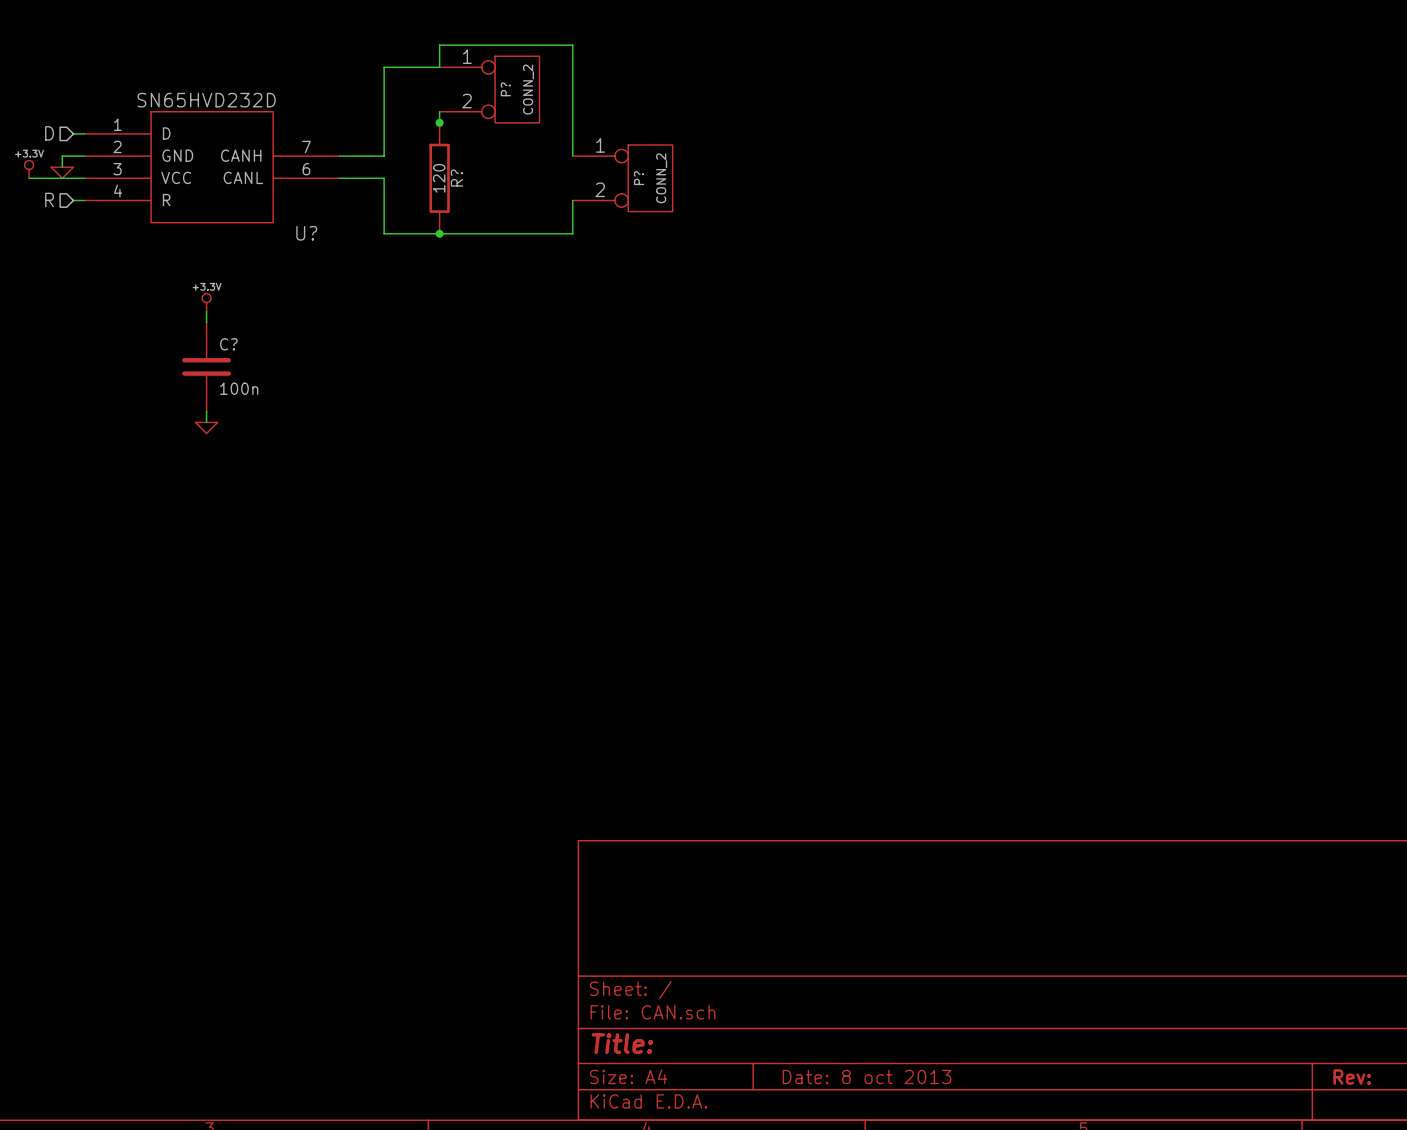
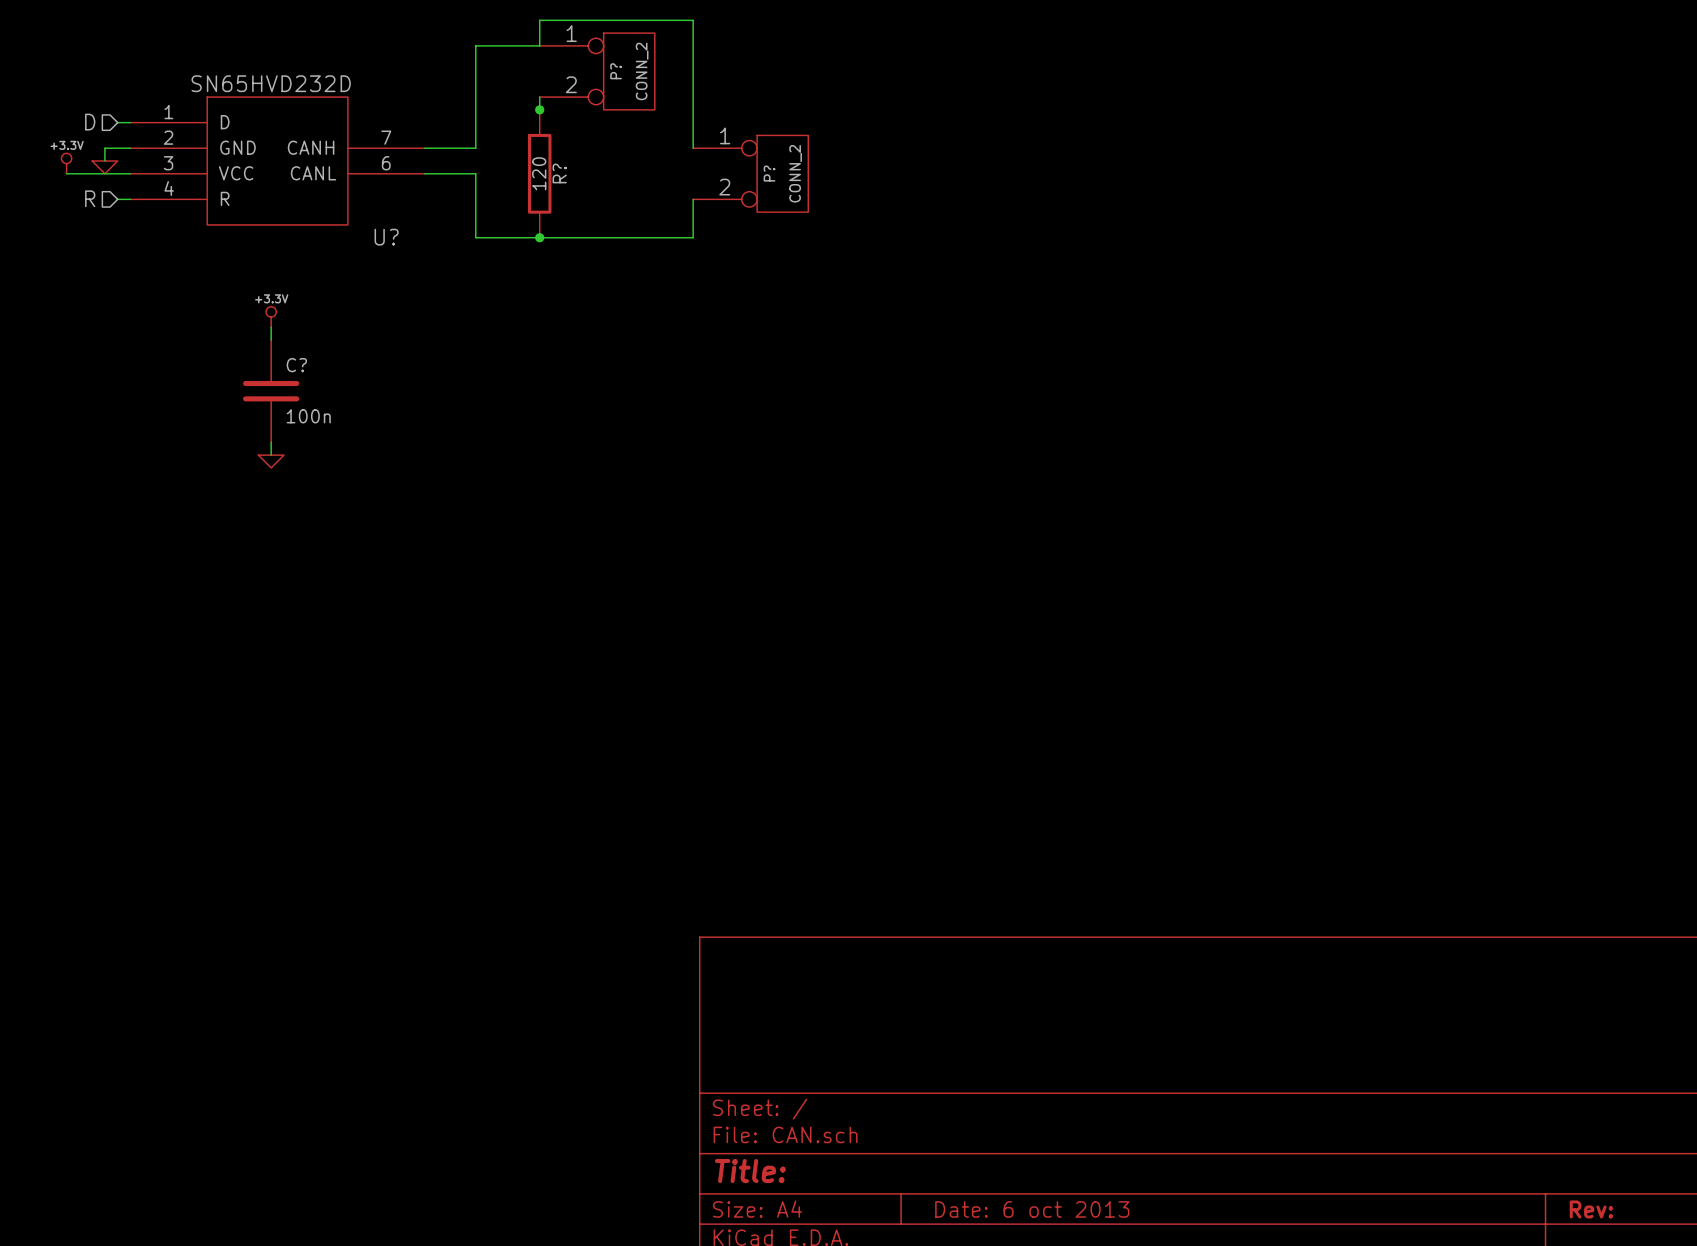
title block: Date: 8 oct 2013 (867, 1076) -> Date: 6 oct 2013 (1032, 1209)

